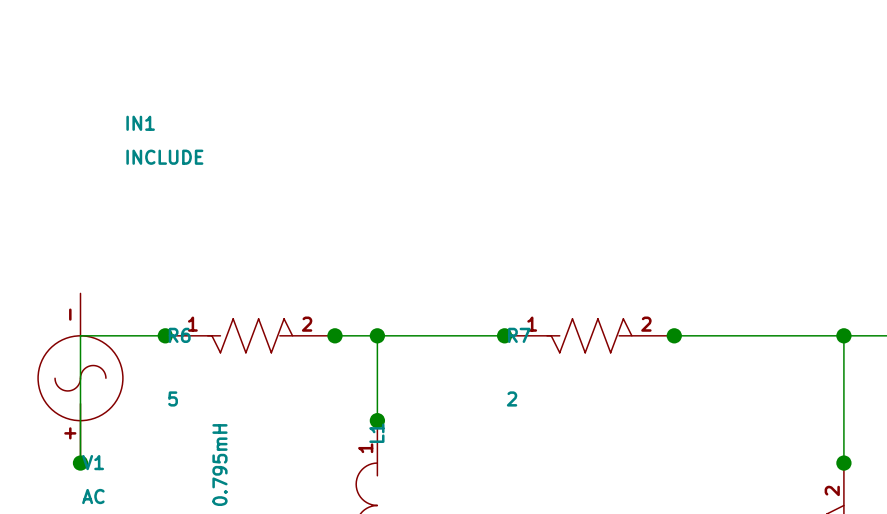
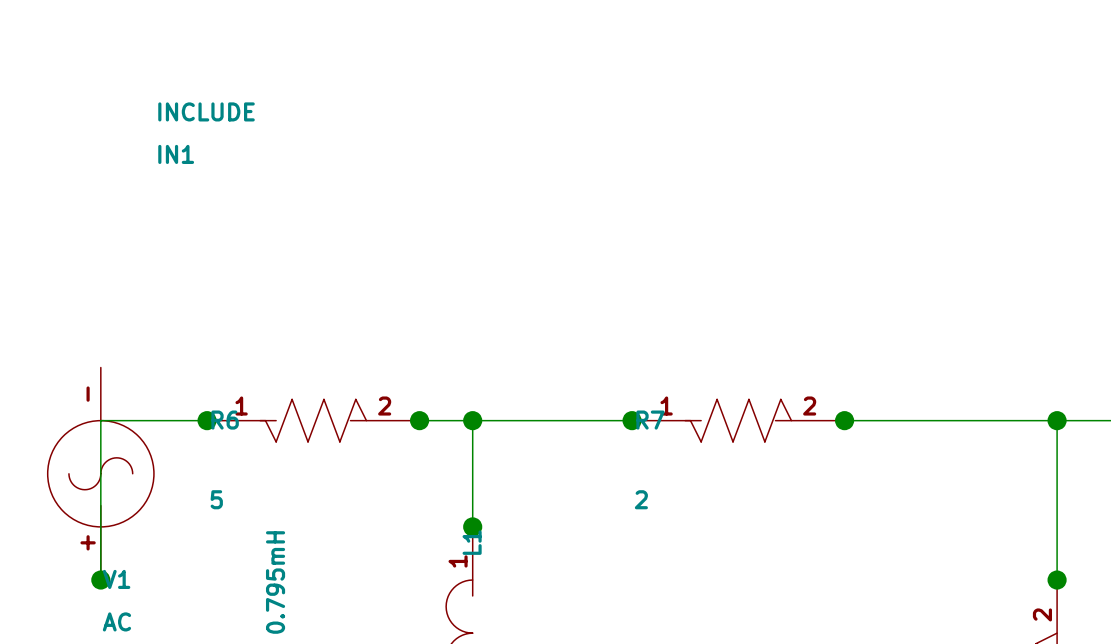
IN1 position: (164, 140) -> (206, 133)
IN1 value position: INCLUDE (164, 157) -> INCLUDE (206, 111)

